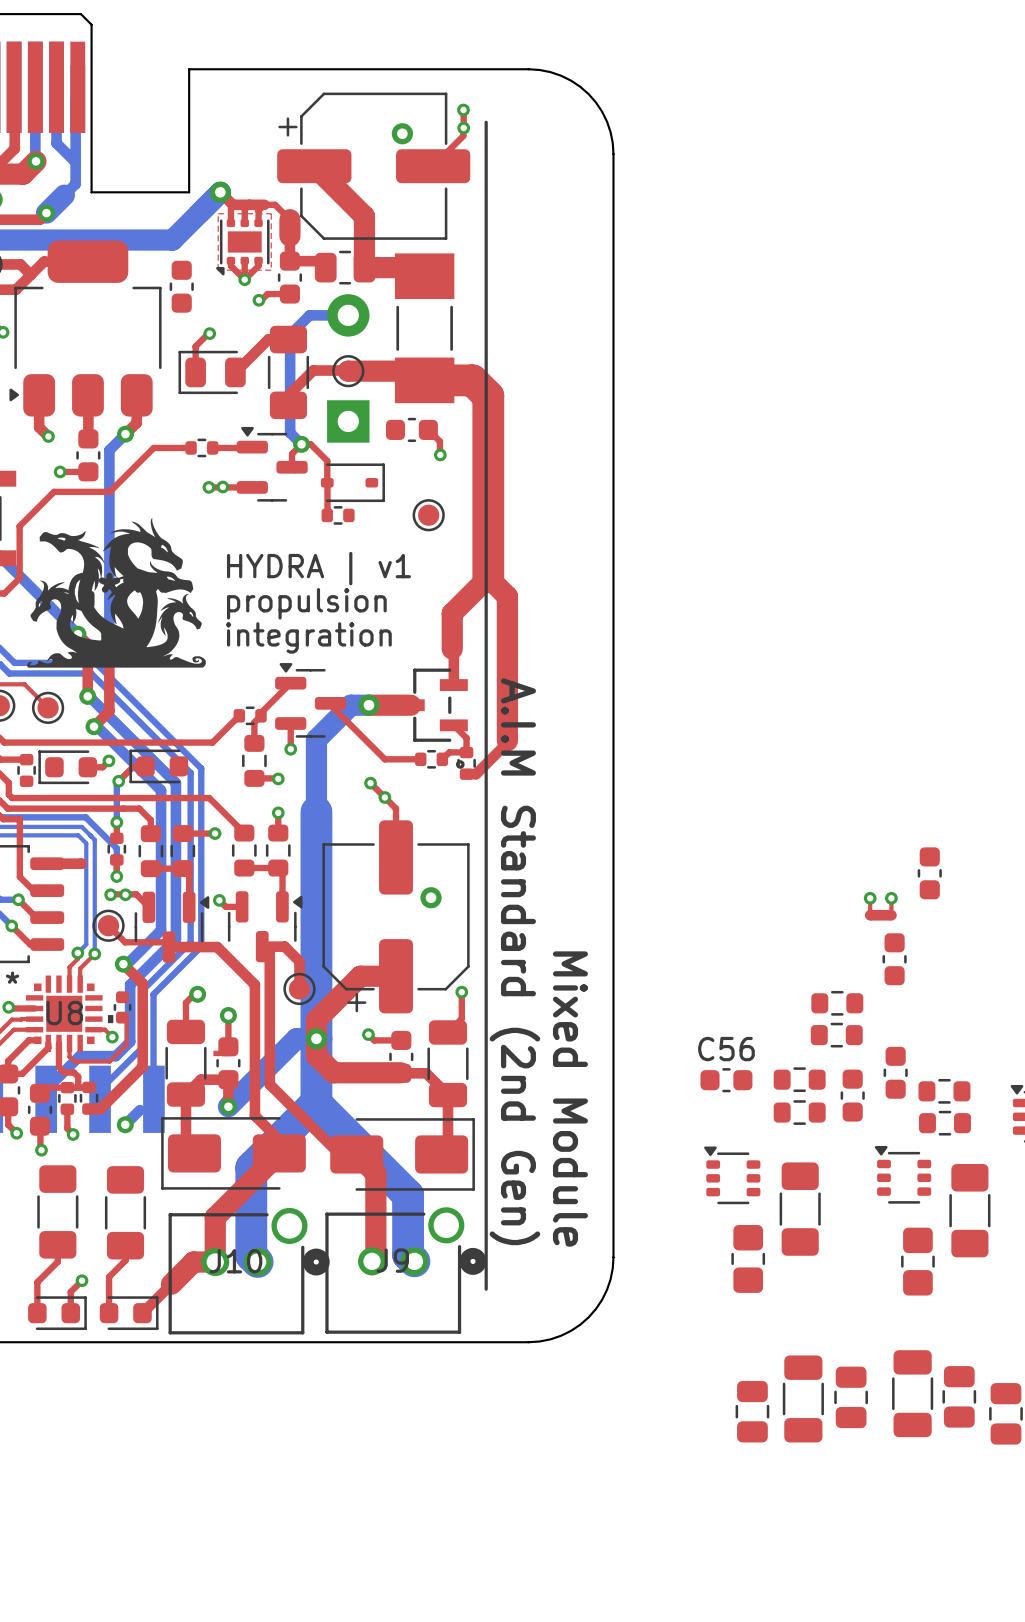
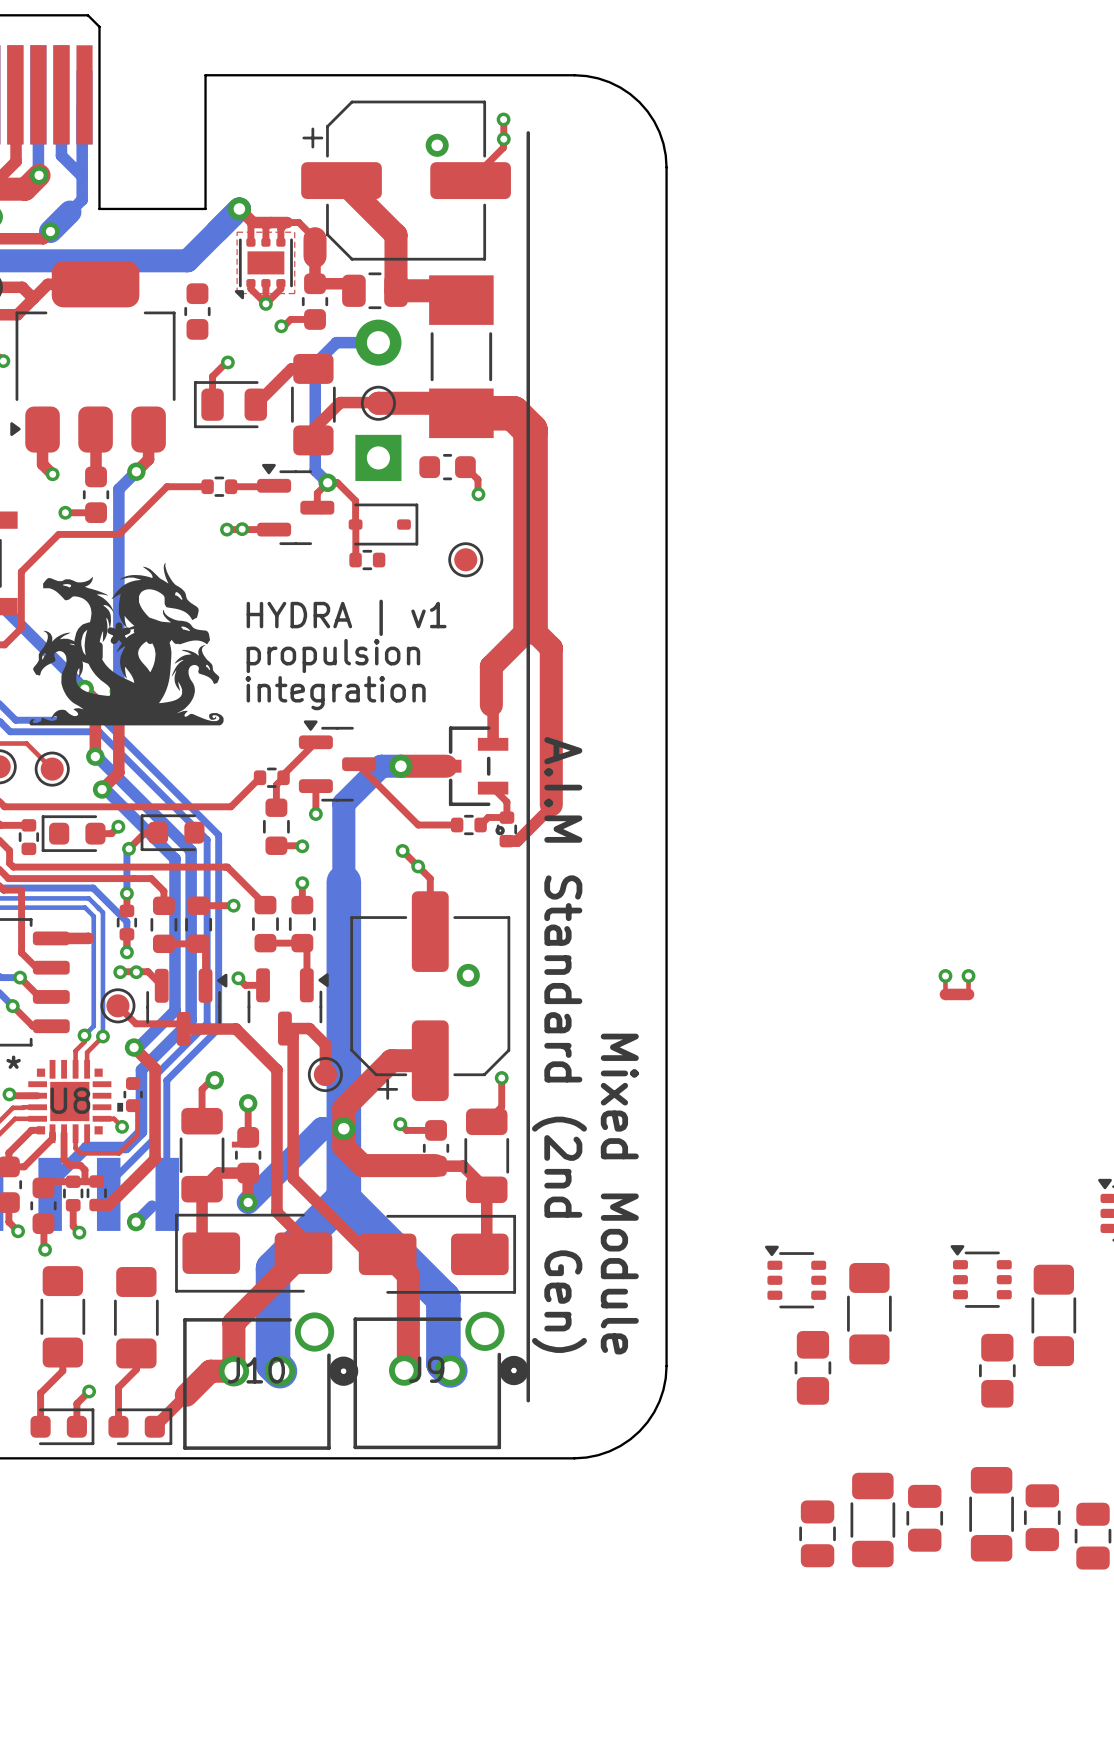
part: (929, 873) -> none
part: (894, 959) -> none
part: (837, 1003) -> none
part: (836, 1035) -> none
part: (895, 1072) -> none
part: (799, 1079) -> none
C56: (726, 1080) -> none
part: (944, 1091) -> none
part: (852, 1095) -> none
part: (799, 1112) -> none
part: (944, 1123) -> none

